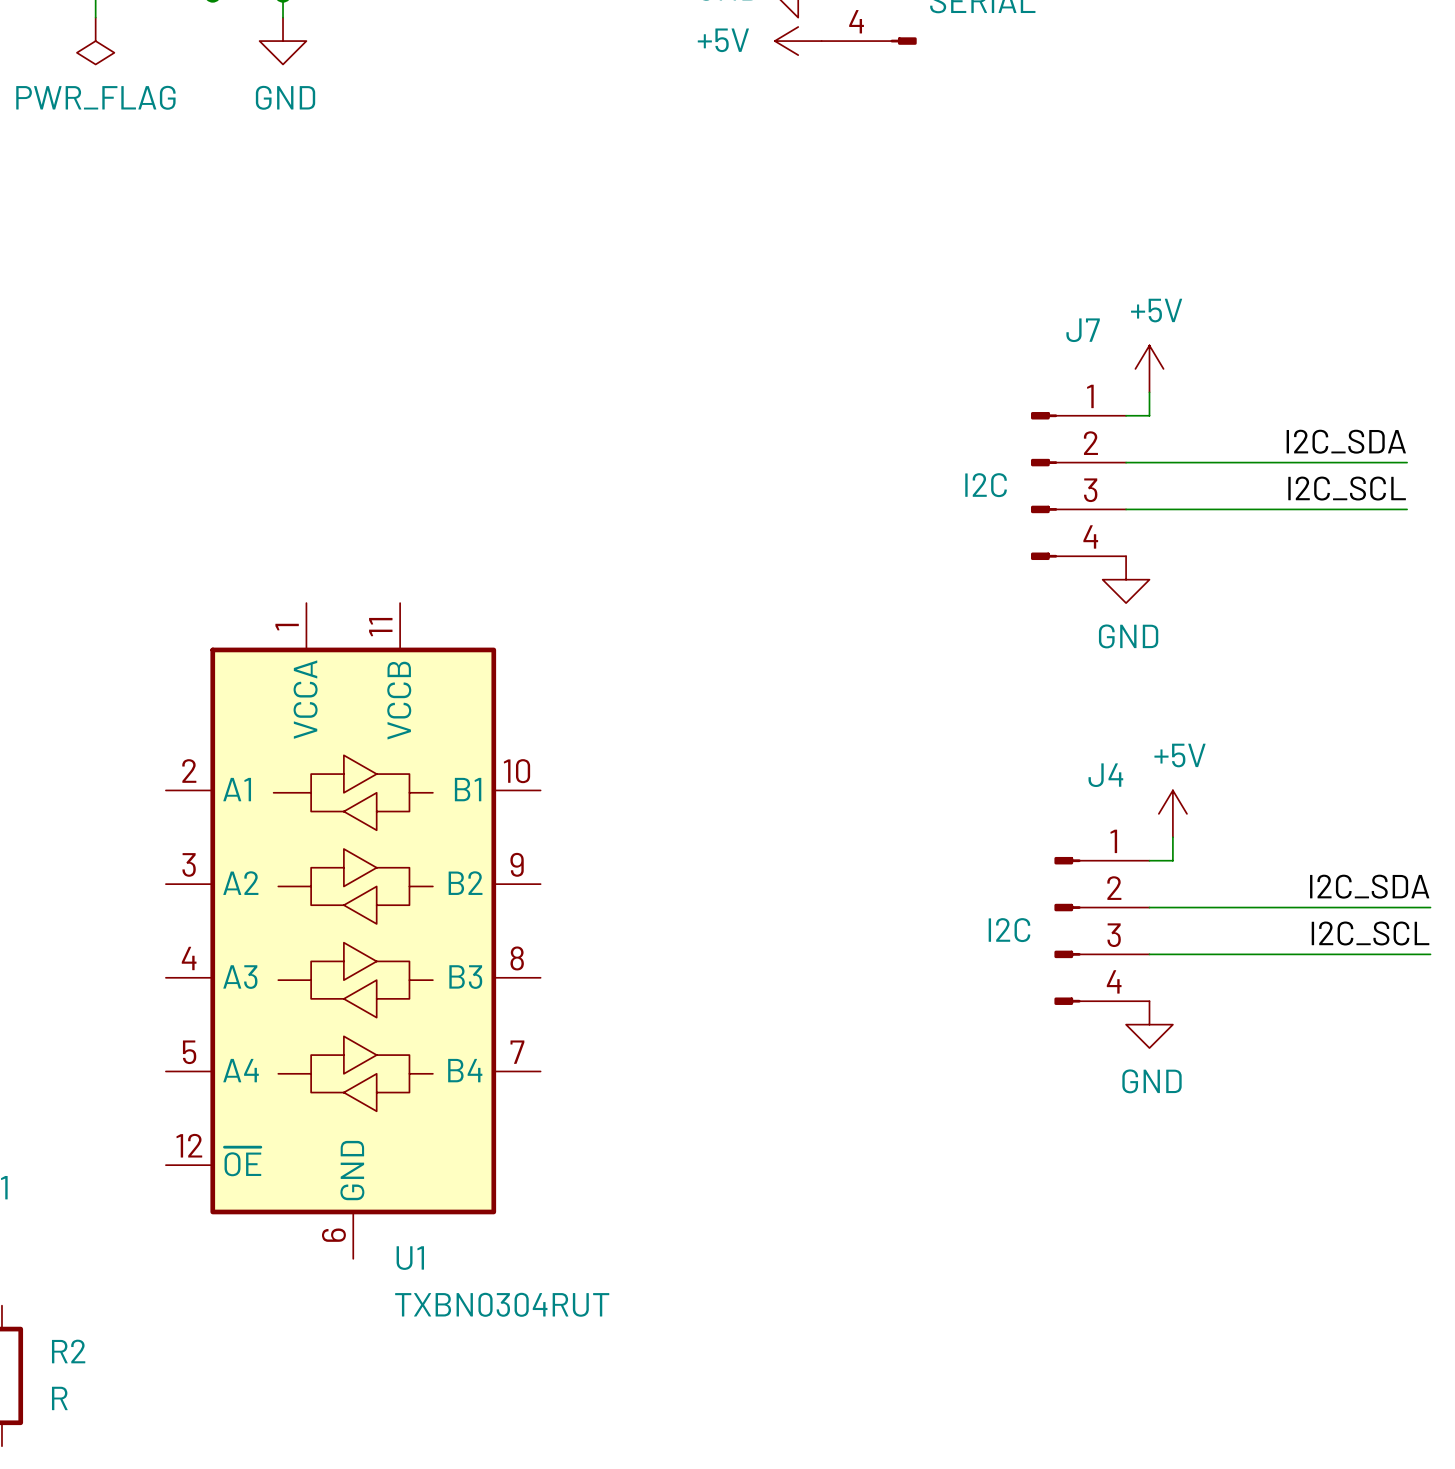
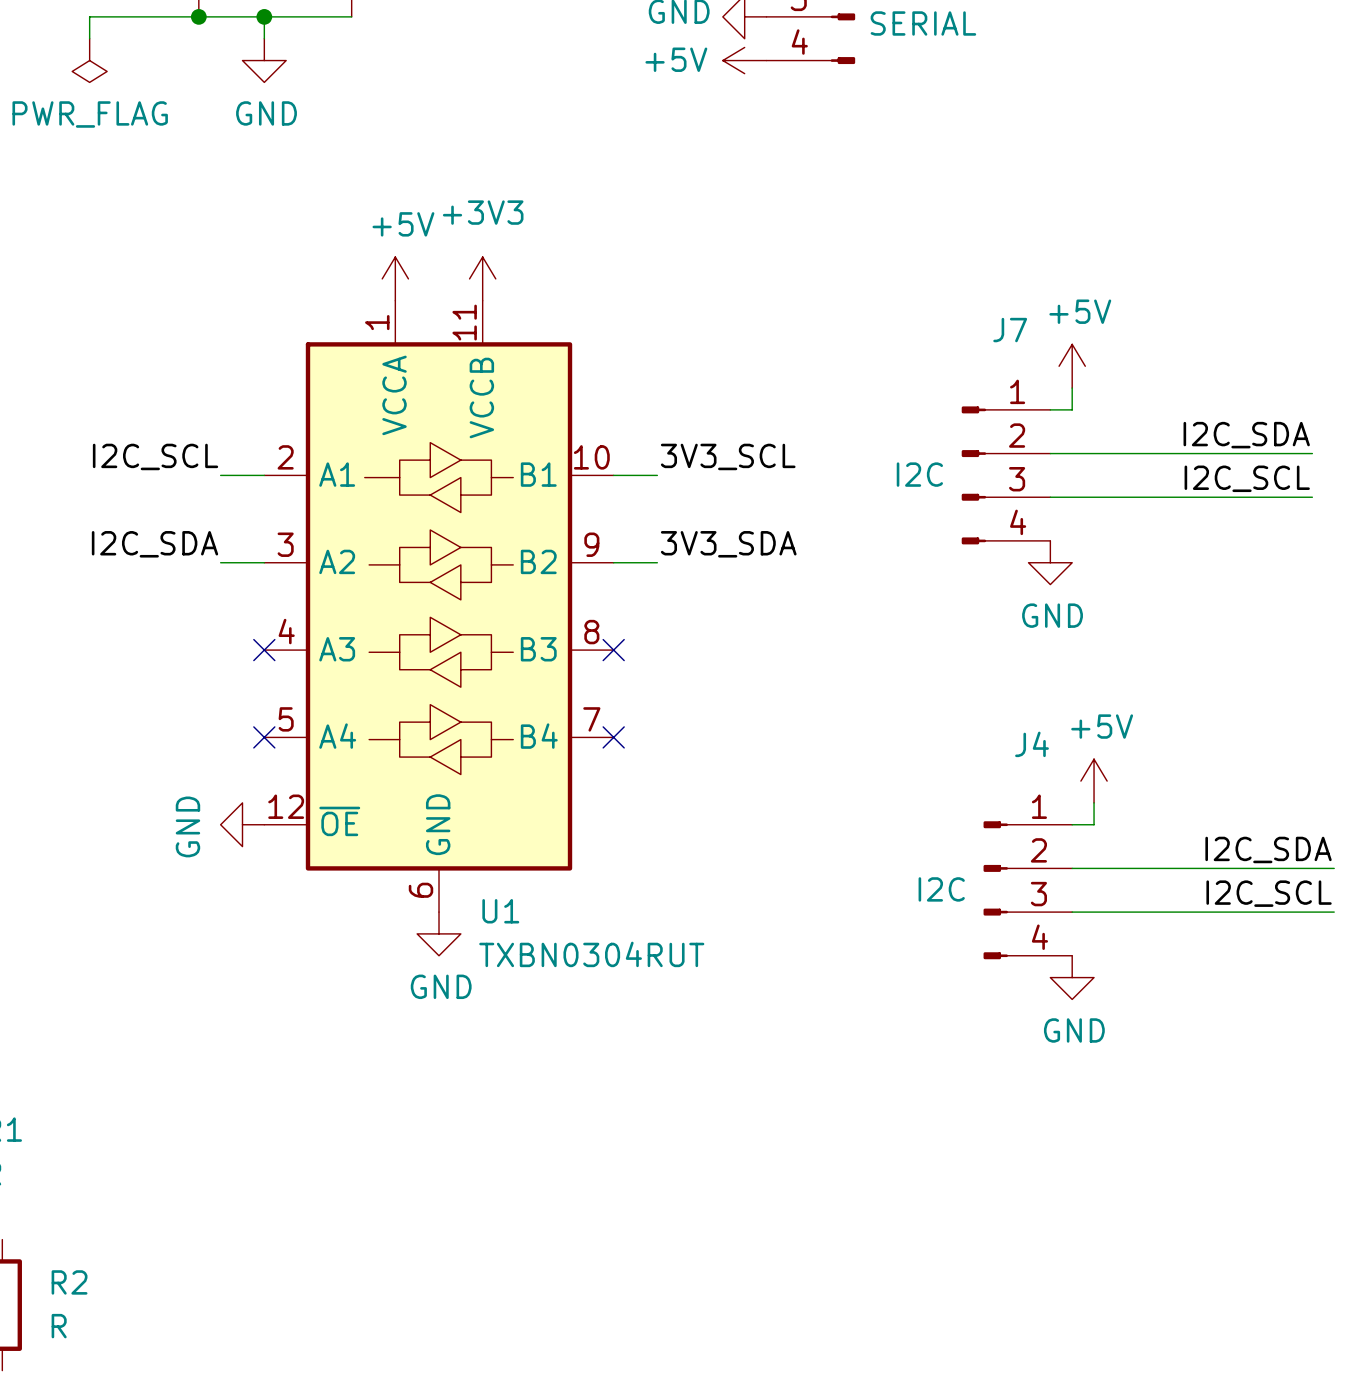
power symbol: none -> +5V (395, 278)
power symbol: none -> +3V3 (482, 278)
label: none -> I2C_SCL (155, 456)
label: none -> 3V3_SCL (728, 456)
wire: none -> (220, 475) (264, 475)
wire: none -> (613, 475) (657, 475)
label: none -> I2C_SDA (154, 544)
label: none -> 3V3_SDA (728, 544)
wire: none -> (220, 562) (264, 562)
wire: none -> (613, 562) (657, 562)
no-connect mark: none -> (264, 650)
no-connect mark: none -> (613, 650)
no-connect mark: none -> (264, 737)
no-connect mark: none -> (613, 737)
power symbol: none -> GND (242, 824)
U1 position: (353, 930) -> (439, 606)
power symbol: none -> GND (439, 933)

